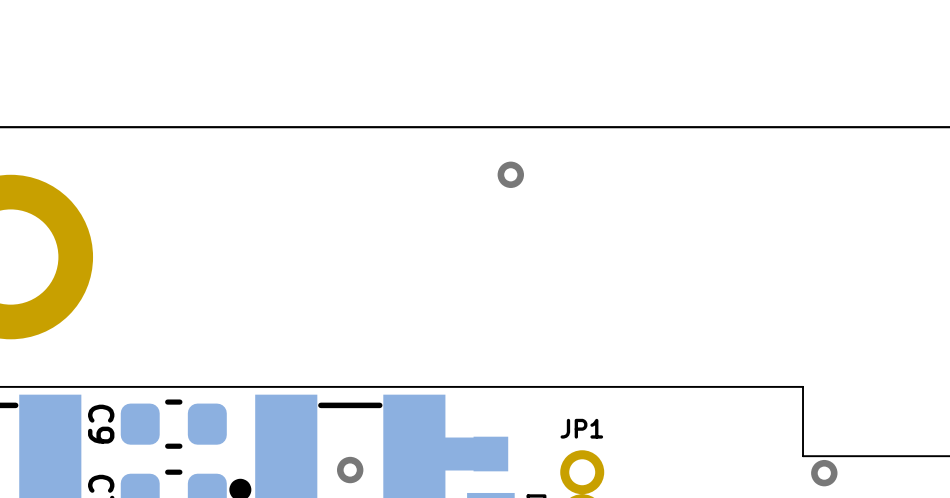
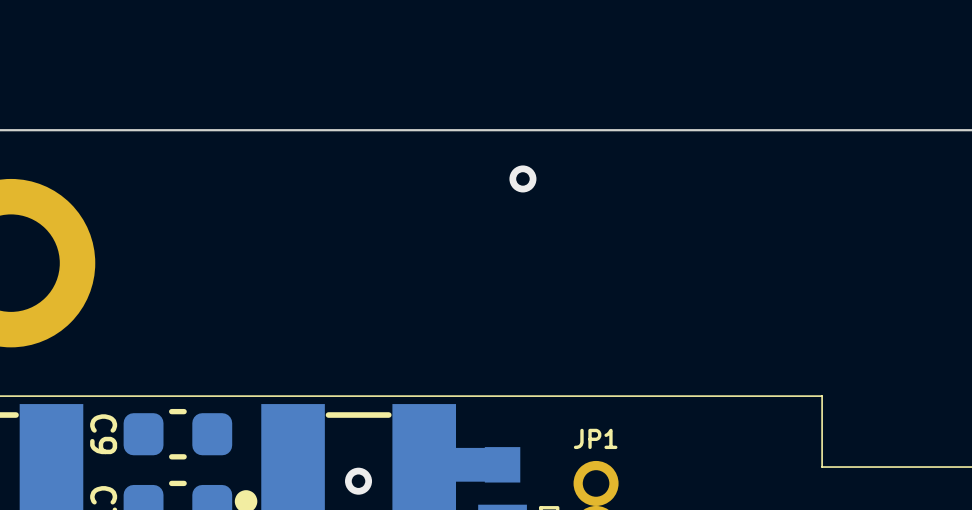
via: (824, 473) -> none

